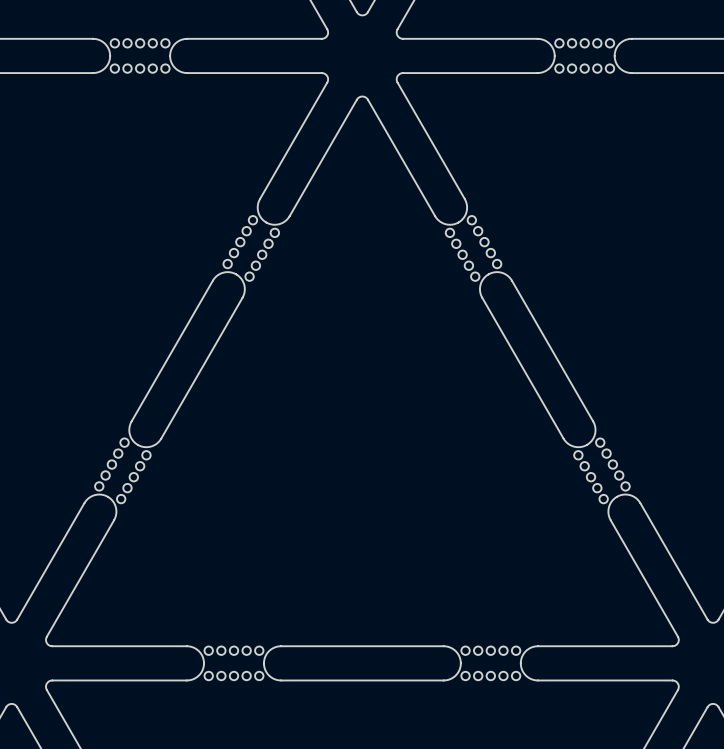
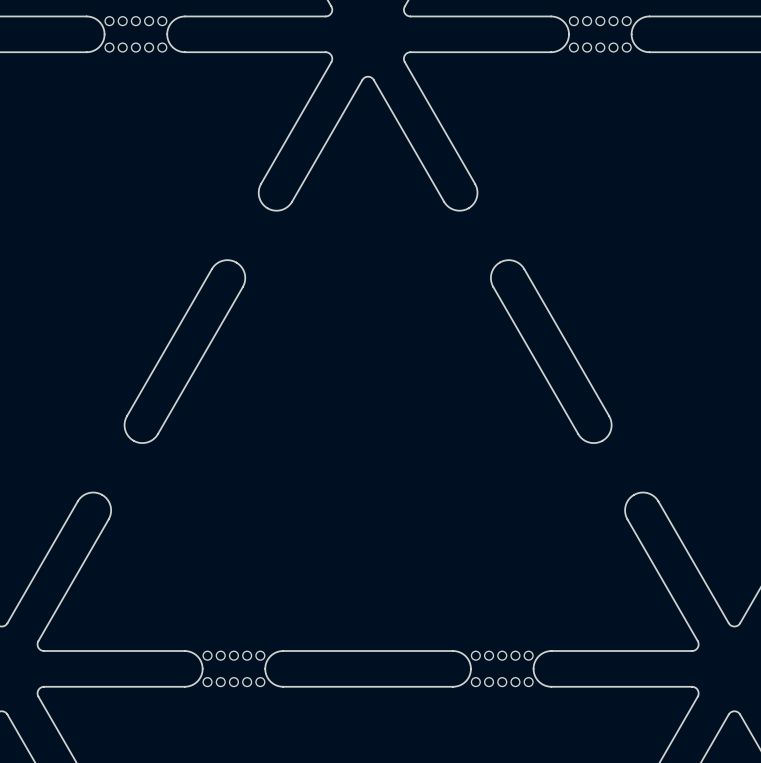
part: (240, 242) -> none
part: (484, 242) -> none
part: (262, 254) -> none
part: (462, 254) -> none
part: (111, 464) -> none
part: (612, 464) -> none
part: (133, 477) -> none
part: (591, 477) -> none

